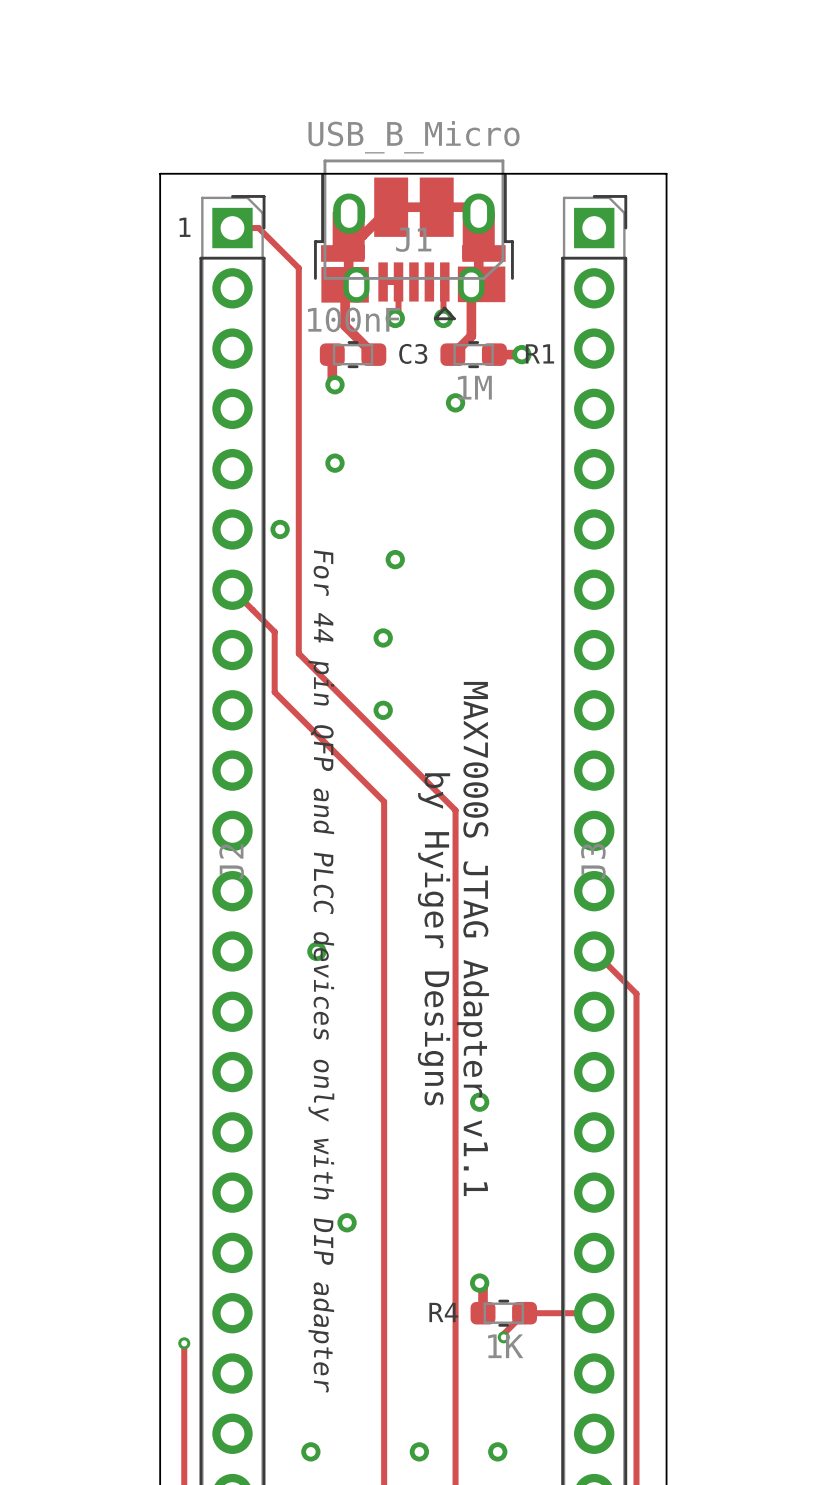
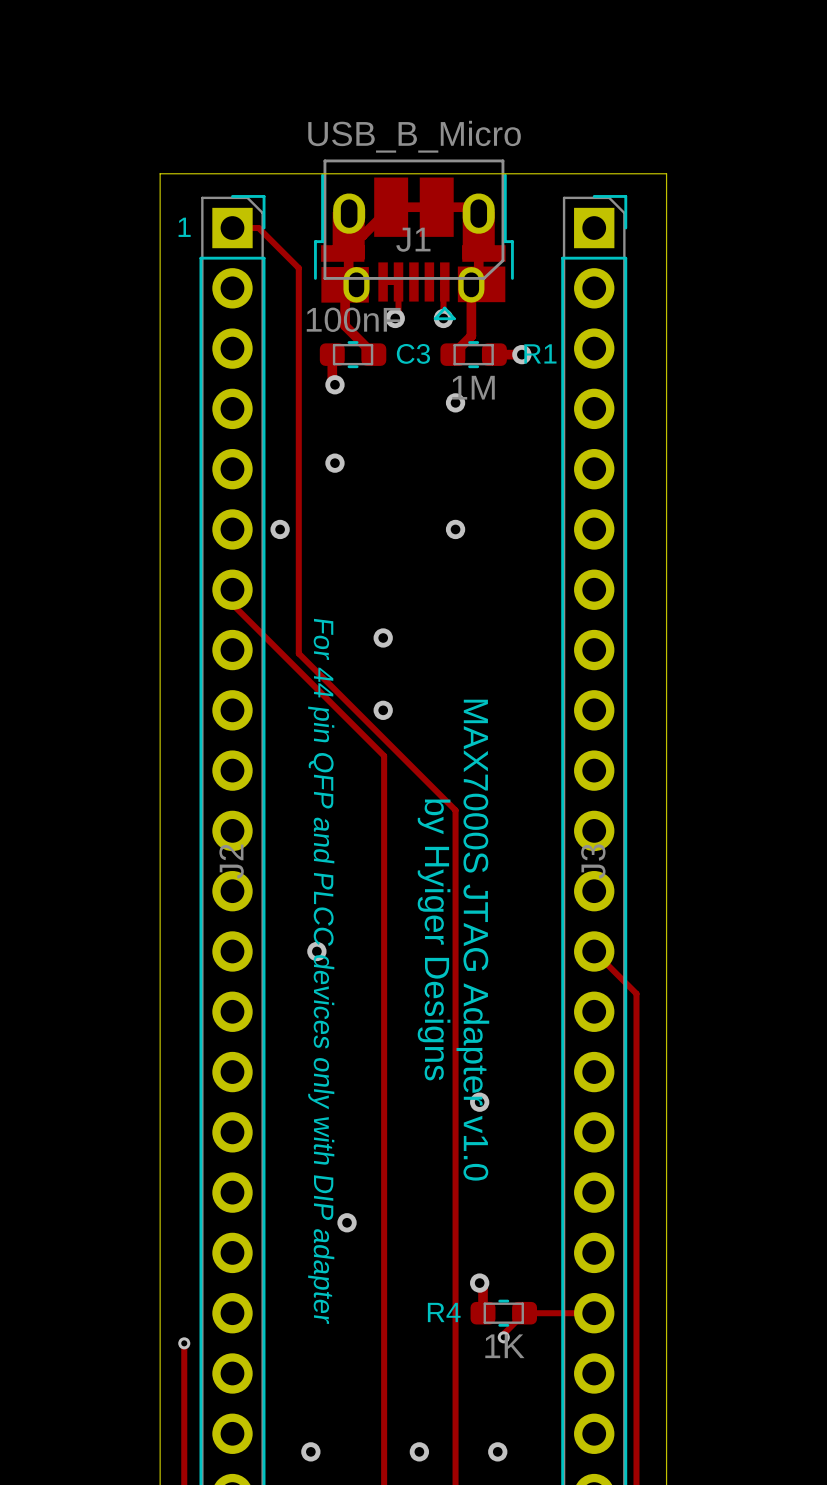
via position: (395, 559) -> (455, 529)
track: (232, 589) (274, 631) (274, 692) (384, 801) -> (232, 589) (232, 604) (384, 755) (384, 801)
text: MAX7000S JTAG Adapter v1.1 (472, 938) -> MAX7000S JTAG Adapter v1.0 (472, 940)

